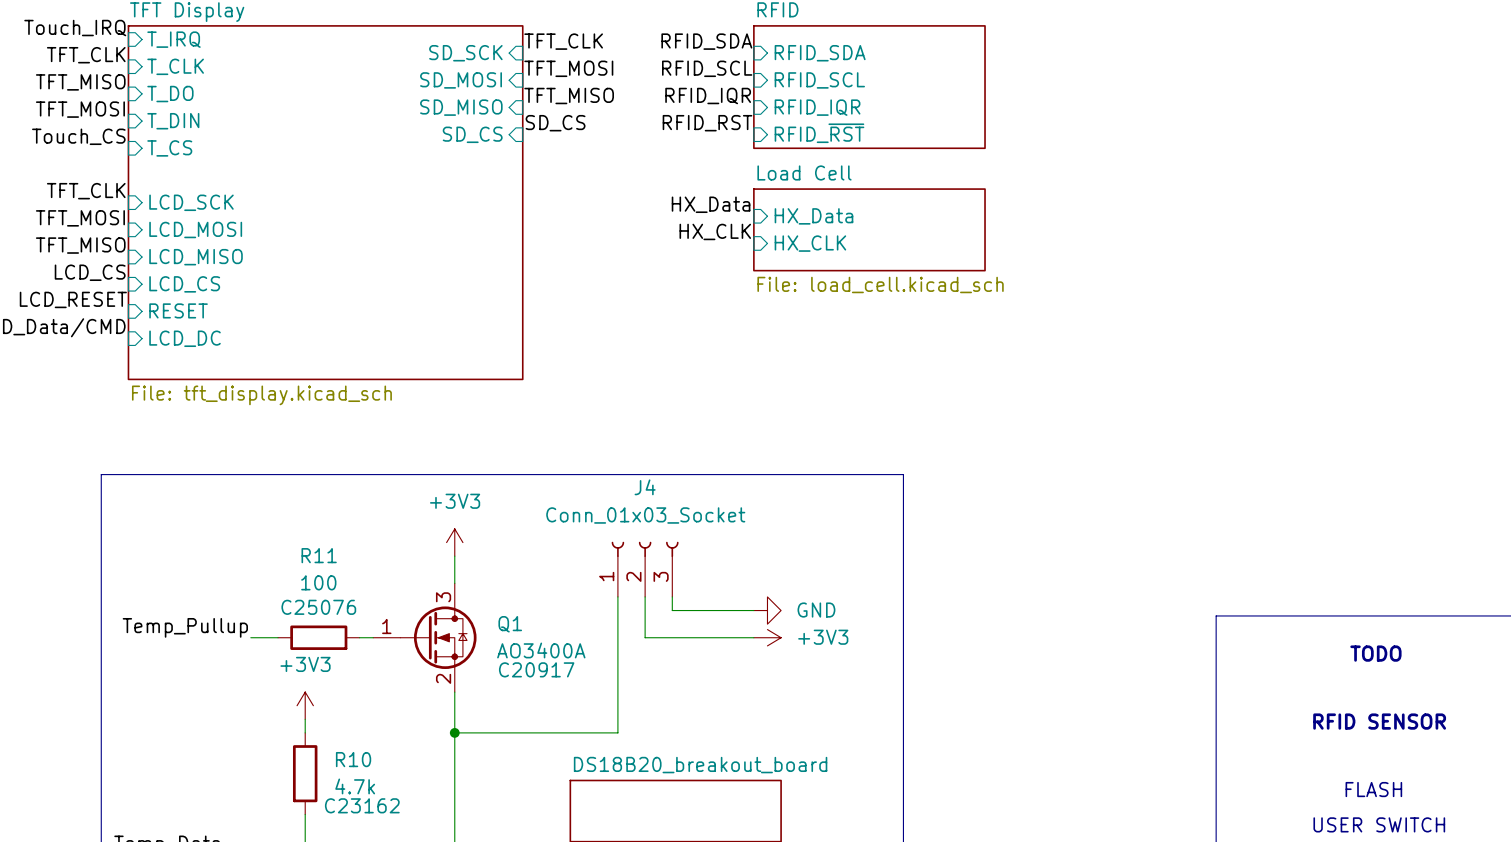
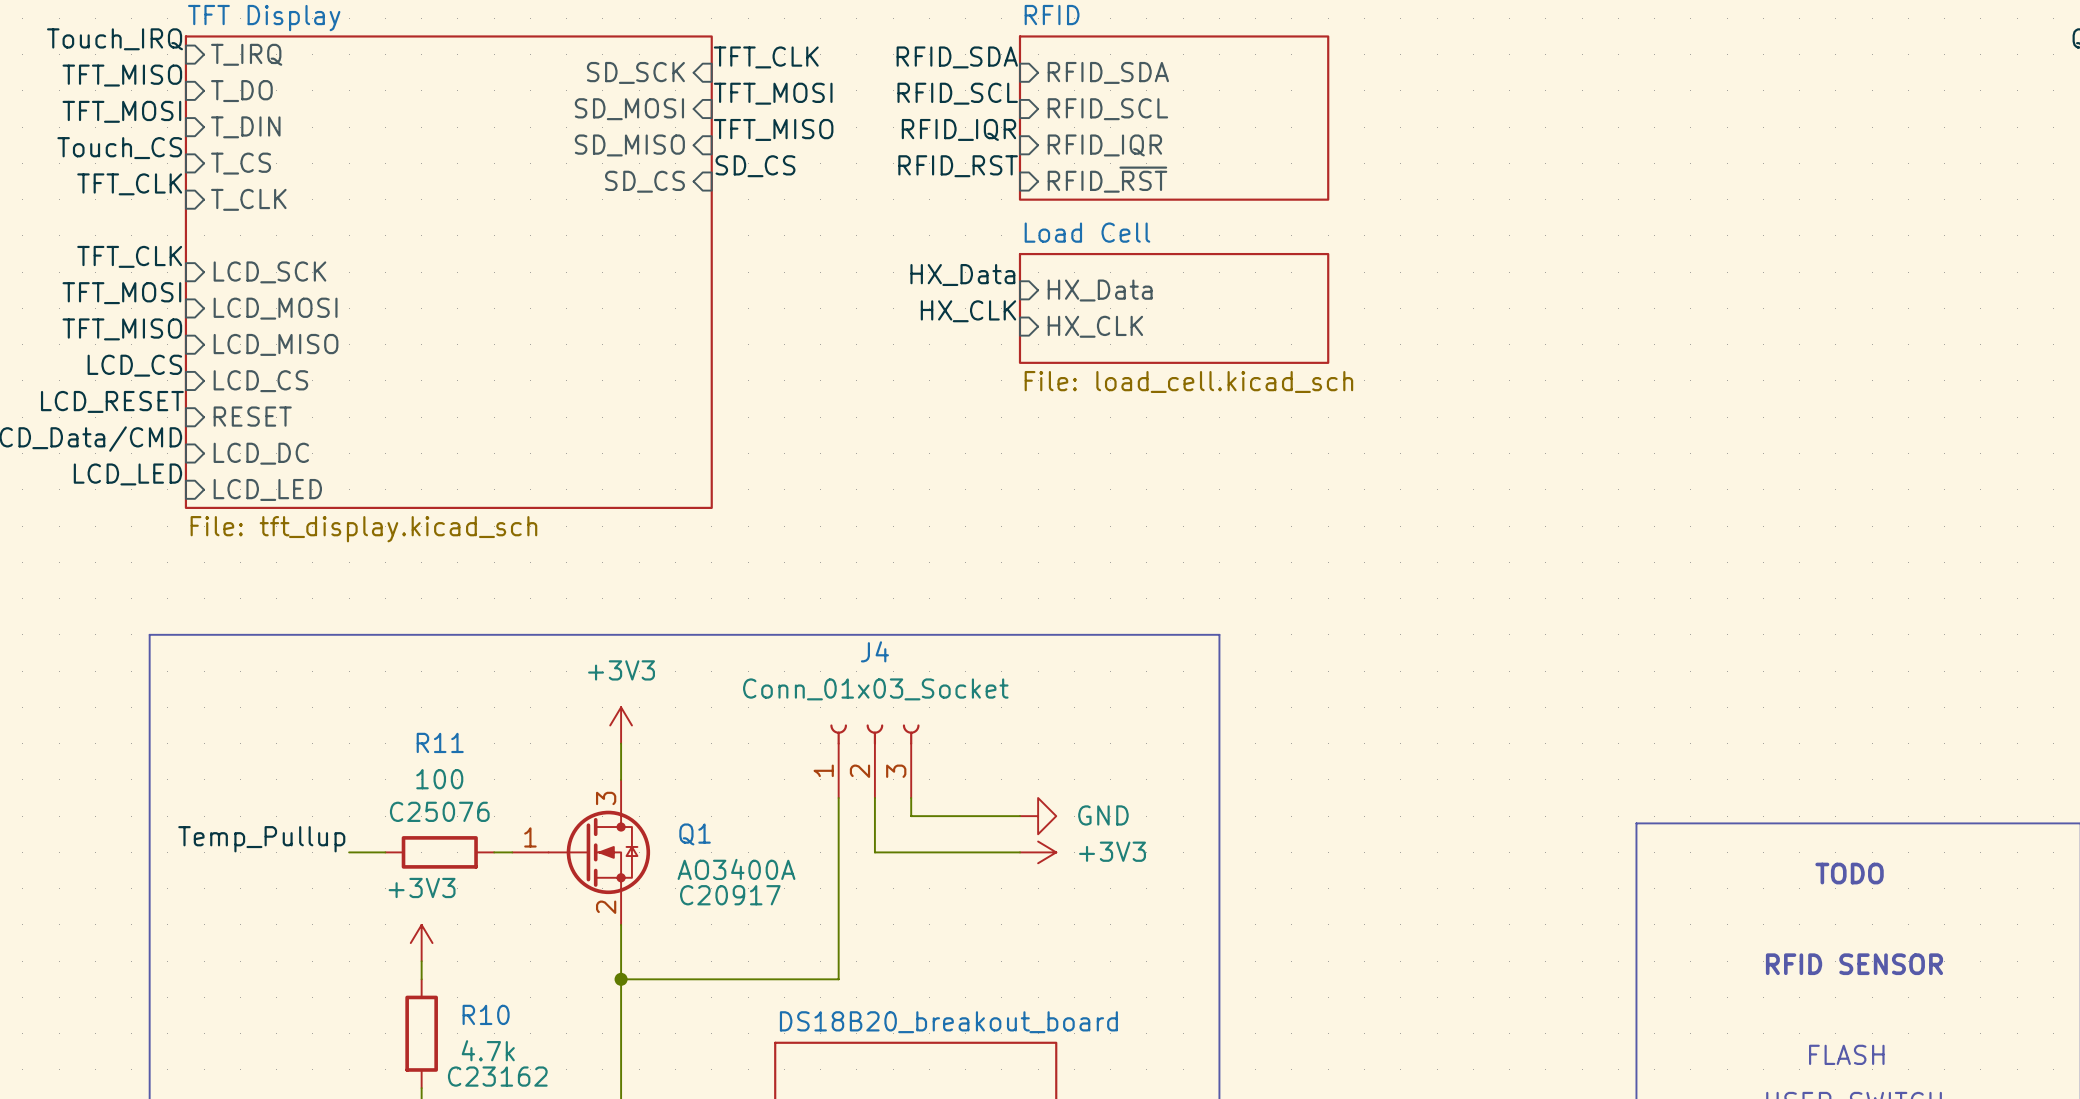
label: TFT_CLK (86, 55) -> TFT_MISO (122, 75)
sheet pin: T_CLK (175, 66) -> T_DO (241, 91)
label: TFT_MISO (80, 82) -> TFT_MOSI (121, 111)
sheet pin: T_DO (170, 94) -> T_DIN (245, 127)
label: TFT_MOSI (80, 109) -> Touch_CS (119, 148)
sheet pin: T_DIN (173, 121) -> T_CS (241, 163)
label: Touch_CS (78, 136) -> TFT_CLK (129, 184)
sheet pin: T_CS (169, 148) -> T_CLK (248, 199)
label: none -> LCD_LED (127, 474)
sheet pin: none -> LCD_LED (267, 489)

